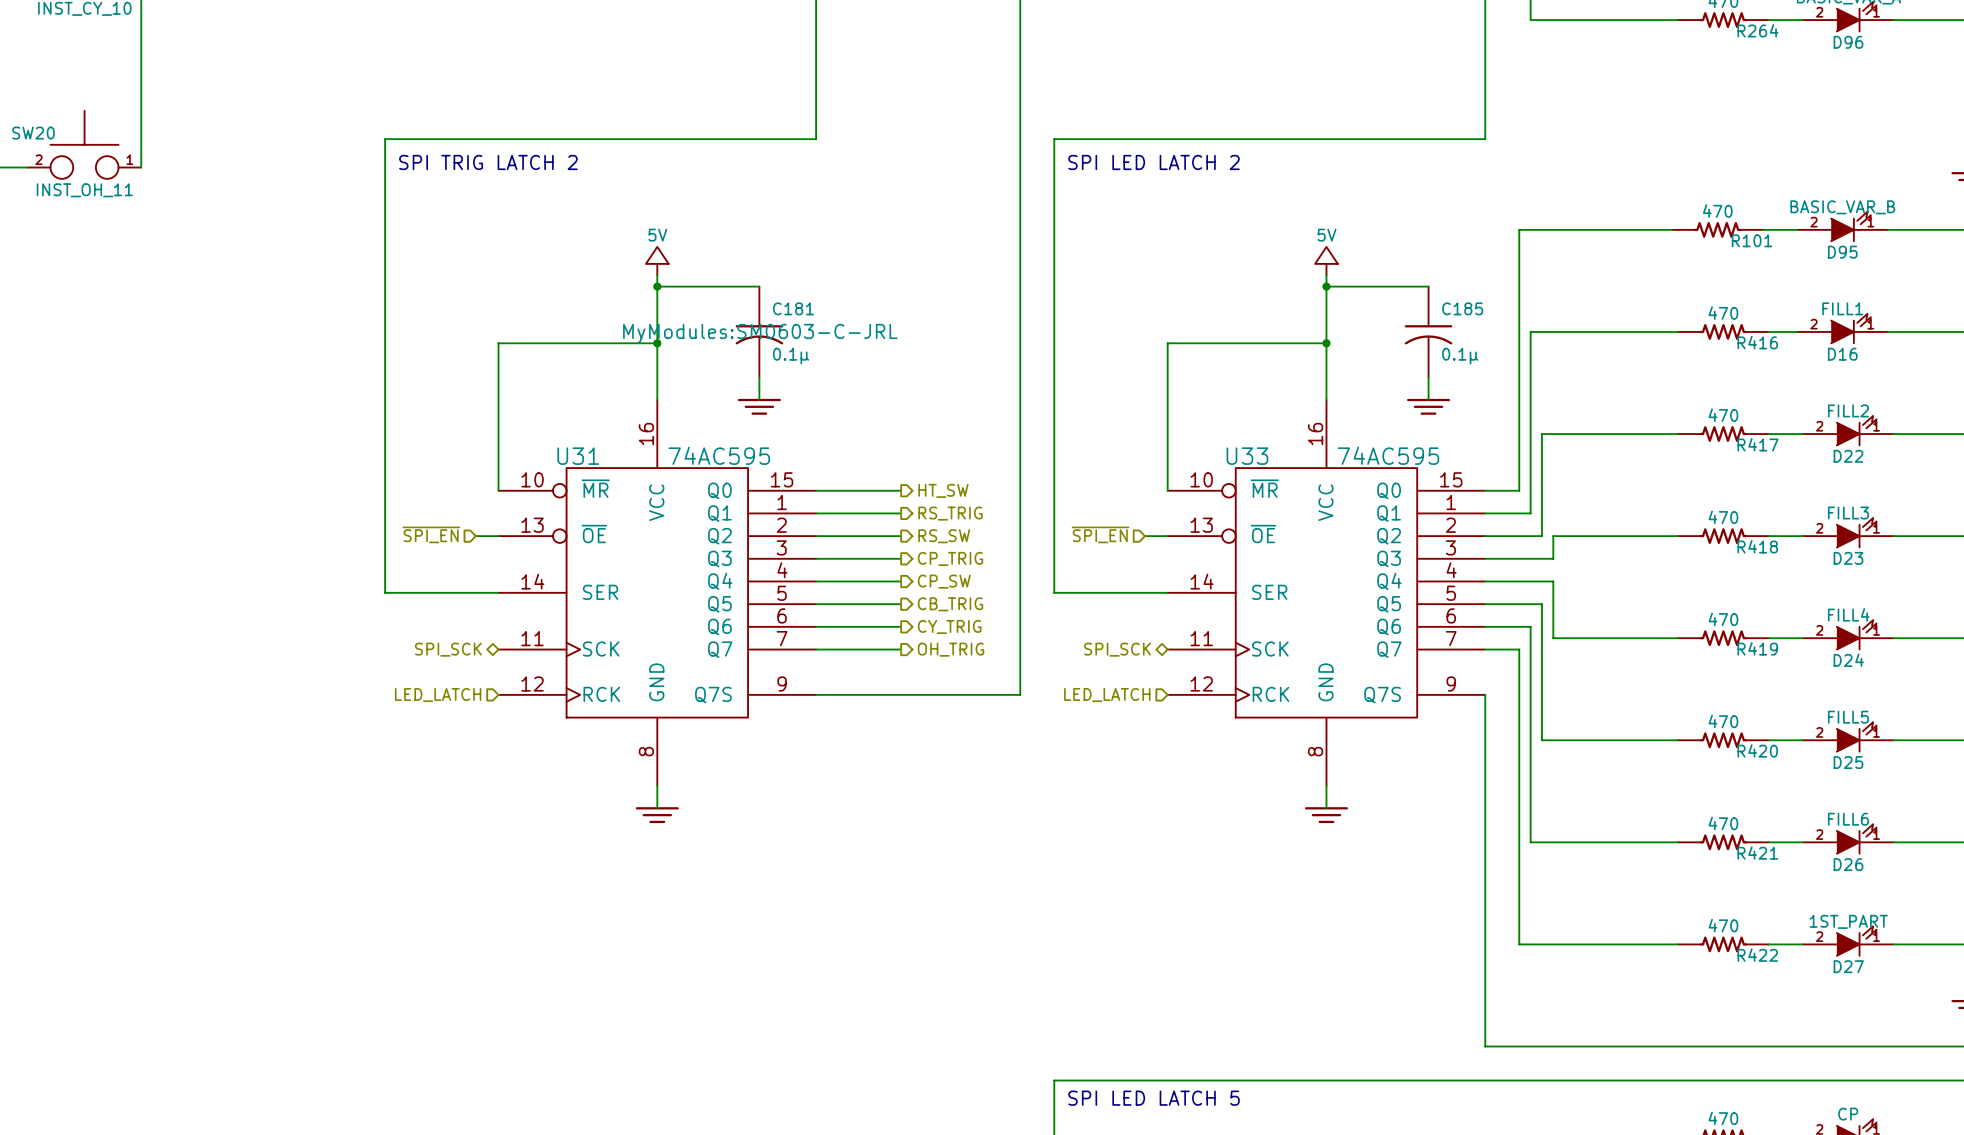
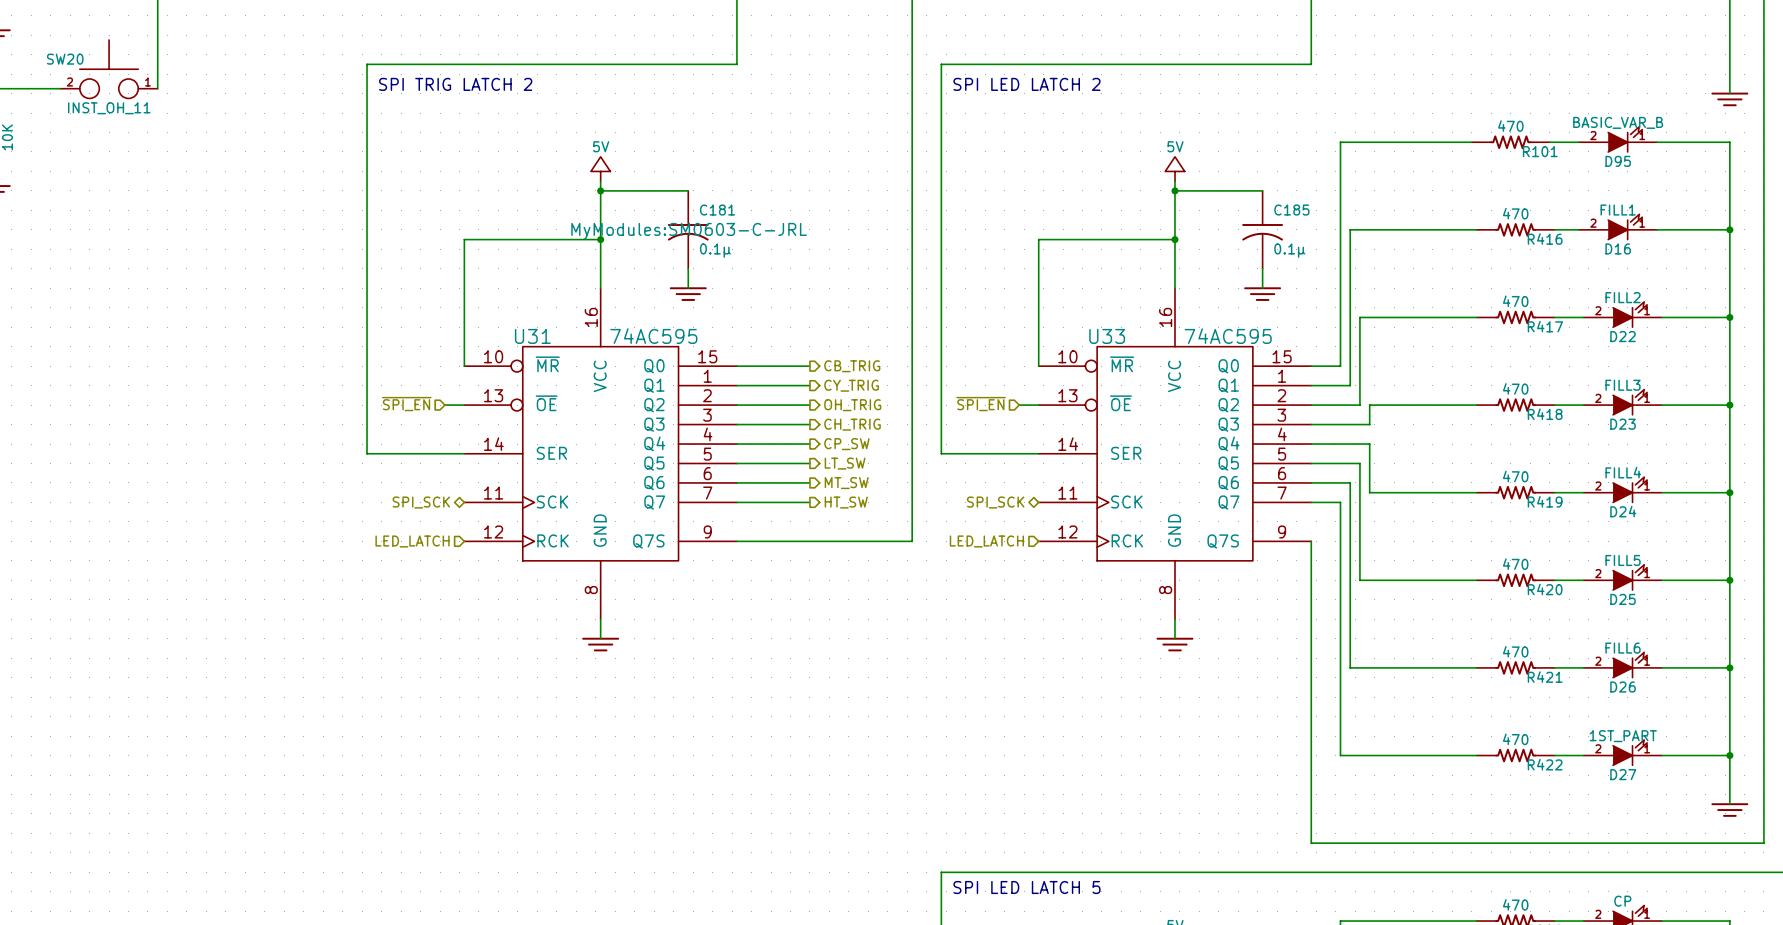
hierarchical label: HT_SW (943, 490) -> CB_TRIG (852, 366)
hierarchical label: RS_TRIG (950, 513) -> CY_TRIG (851, 385)
hierarchical label: RS_SW (944, 536) -> OH_TRIG (852, 405)
hierarchical label: CP_TRIG (950, 558) -> CH_TRIG (852, 424)
hierarchical label: CB_TRIG (950, 604) -> LT_SW (845, 463)
hierarchical label: CY_TRIG (949, 626) -> MT_SW (846, 483)
hierarchical label: OH_TRIG (951, 649) -> HT_SW (846, 502)

